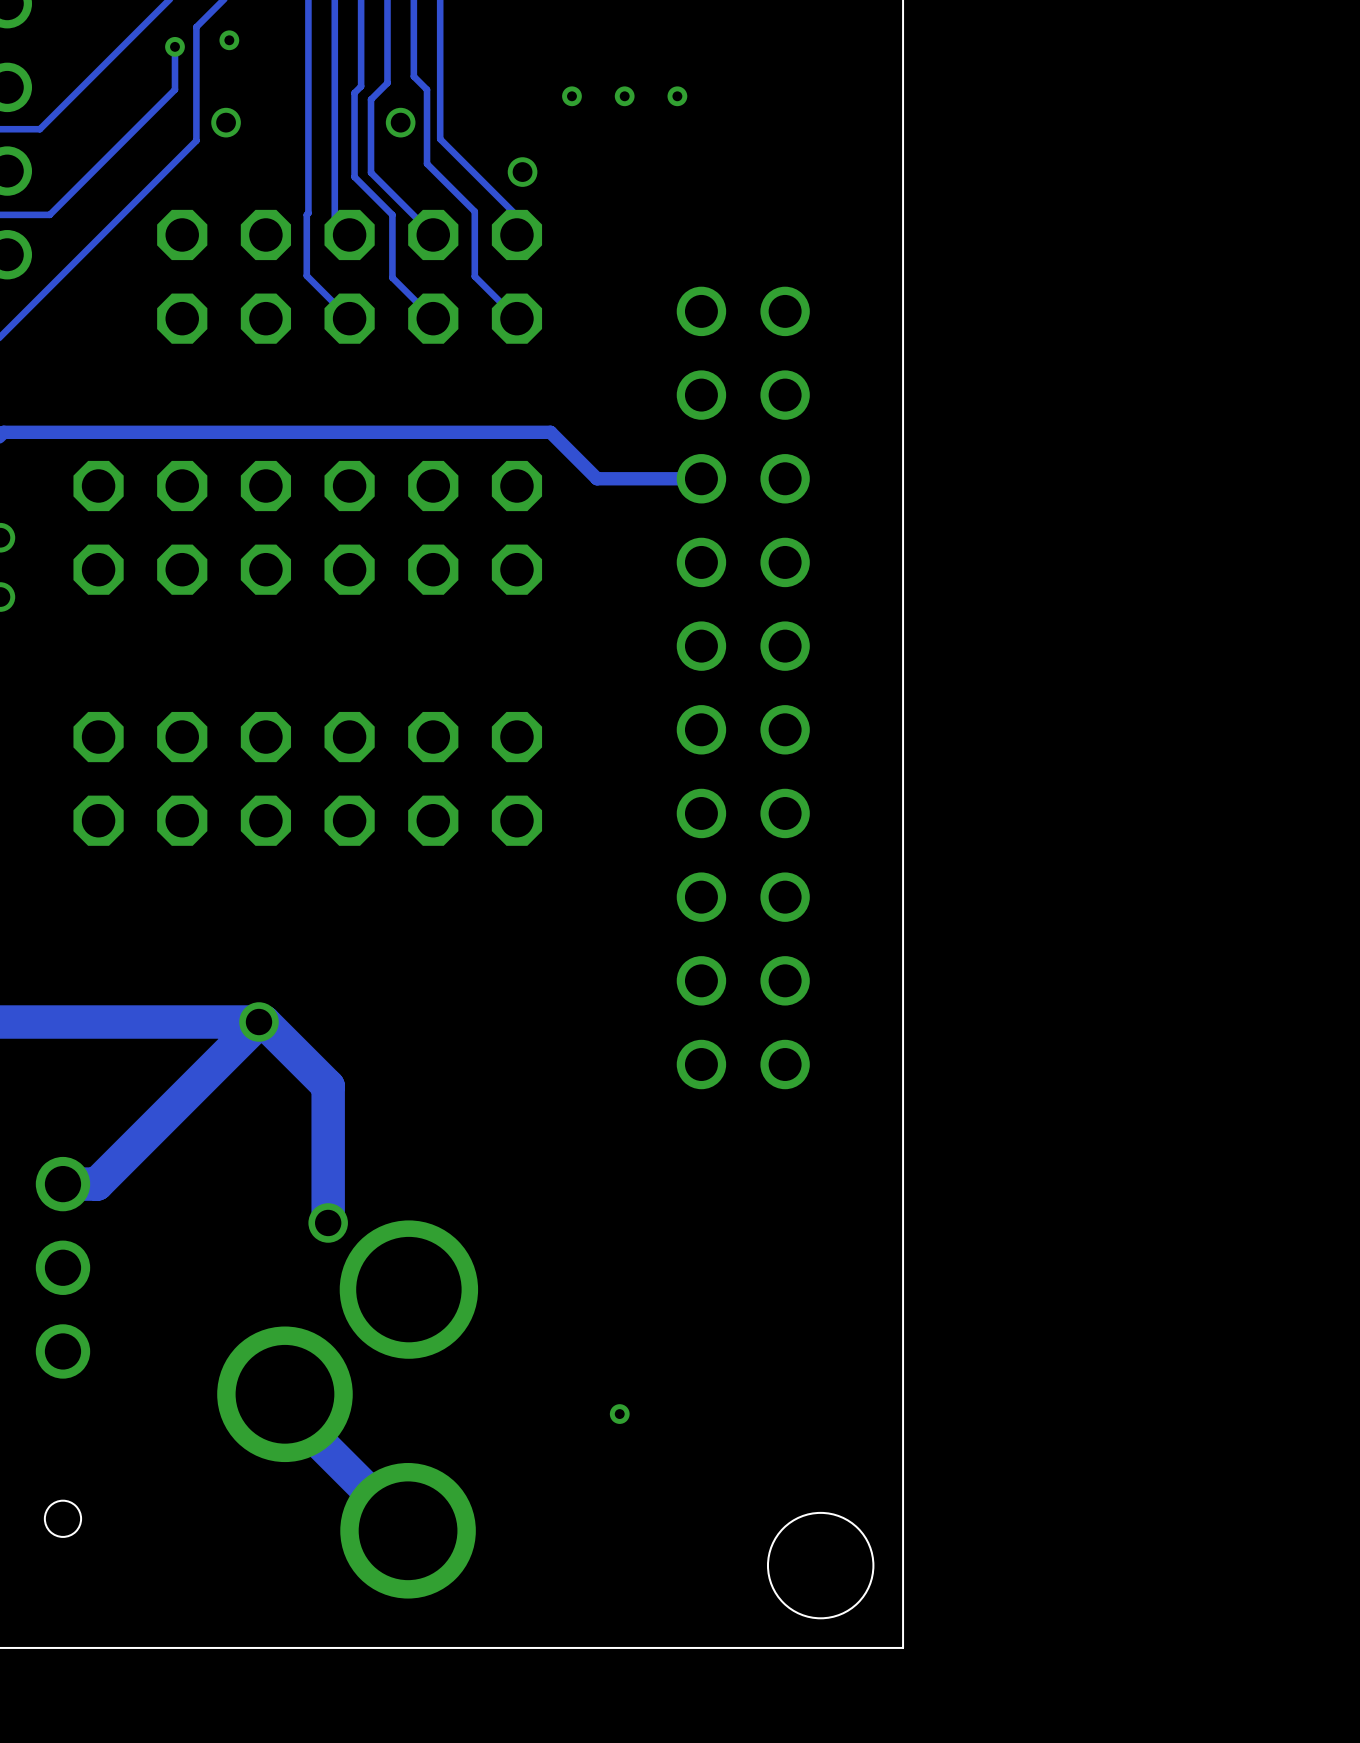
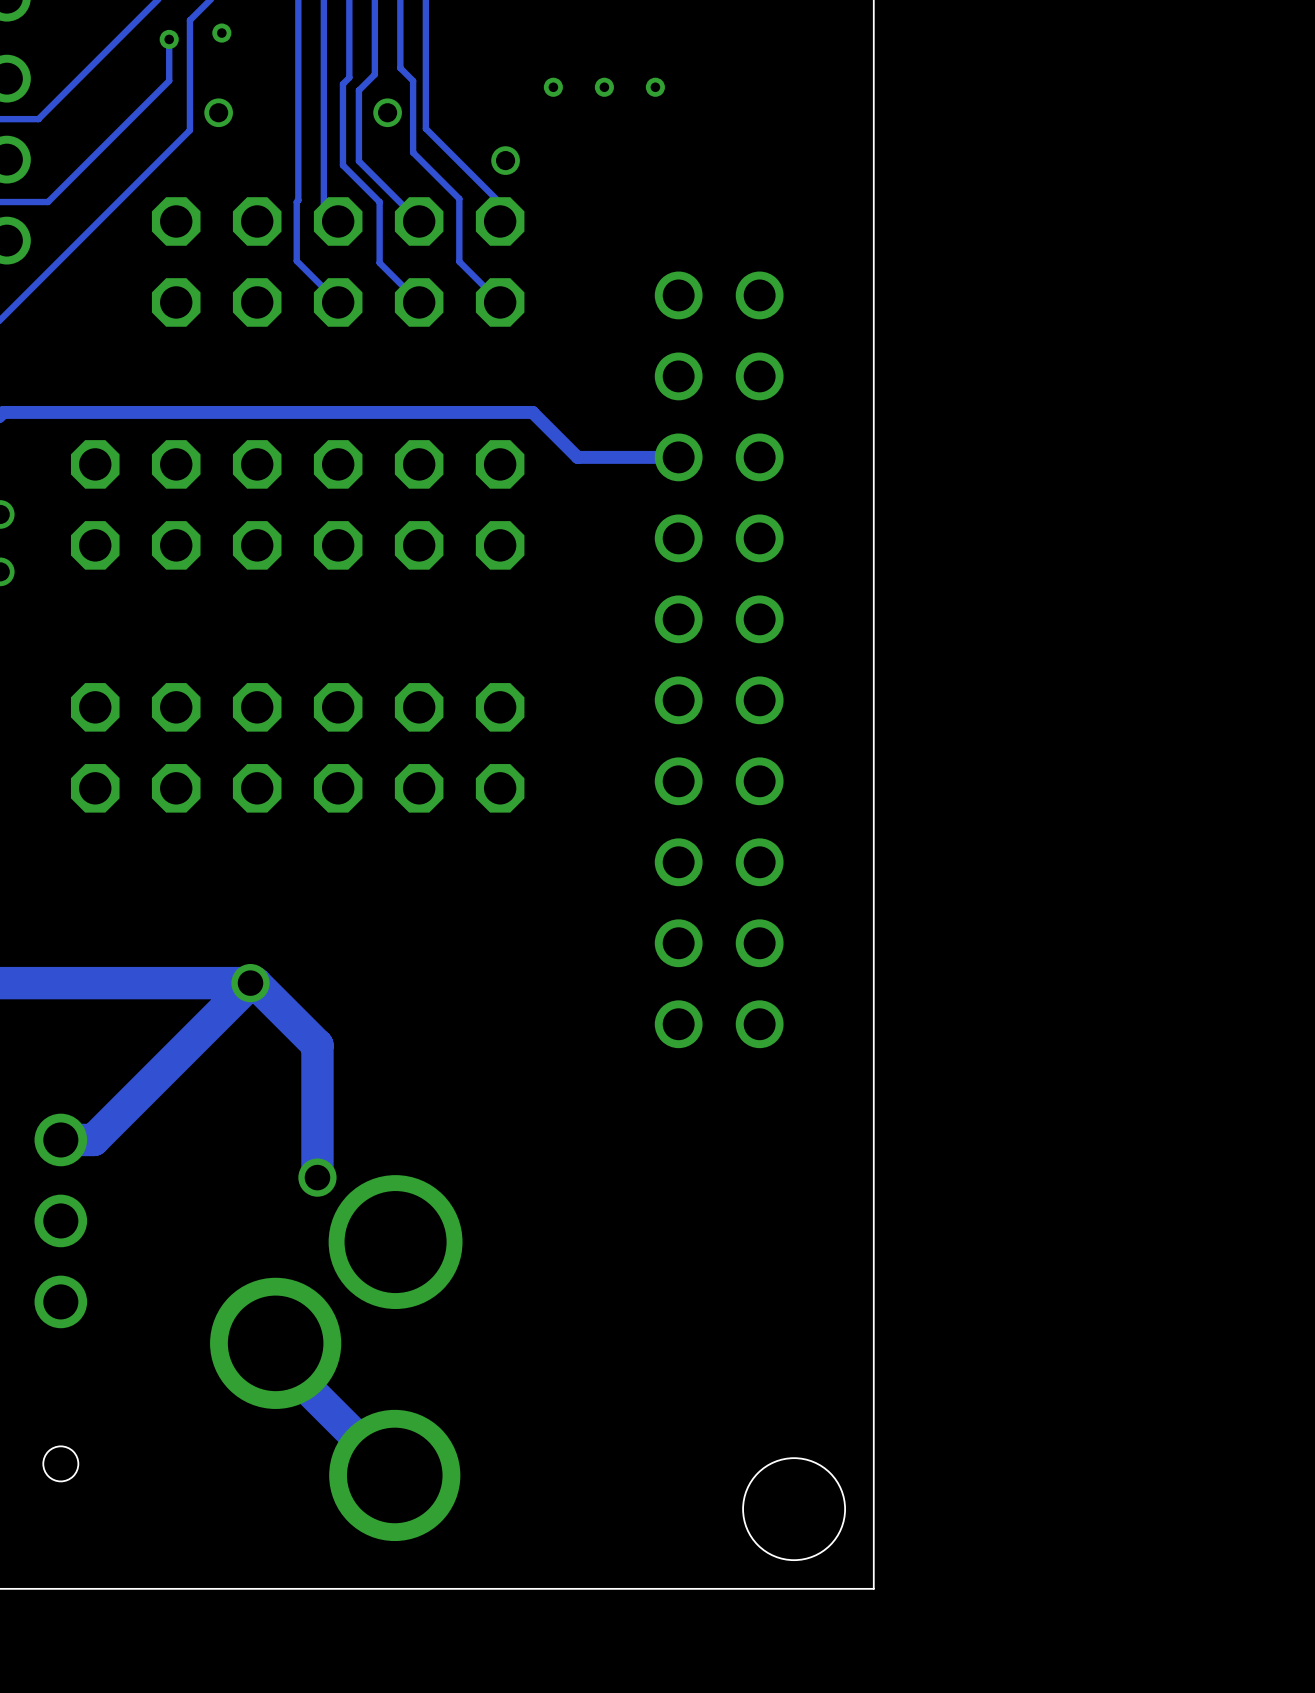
via: (619, 1414) -> none

